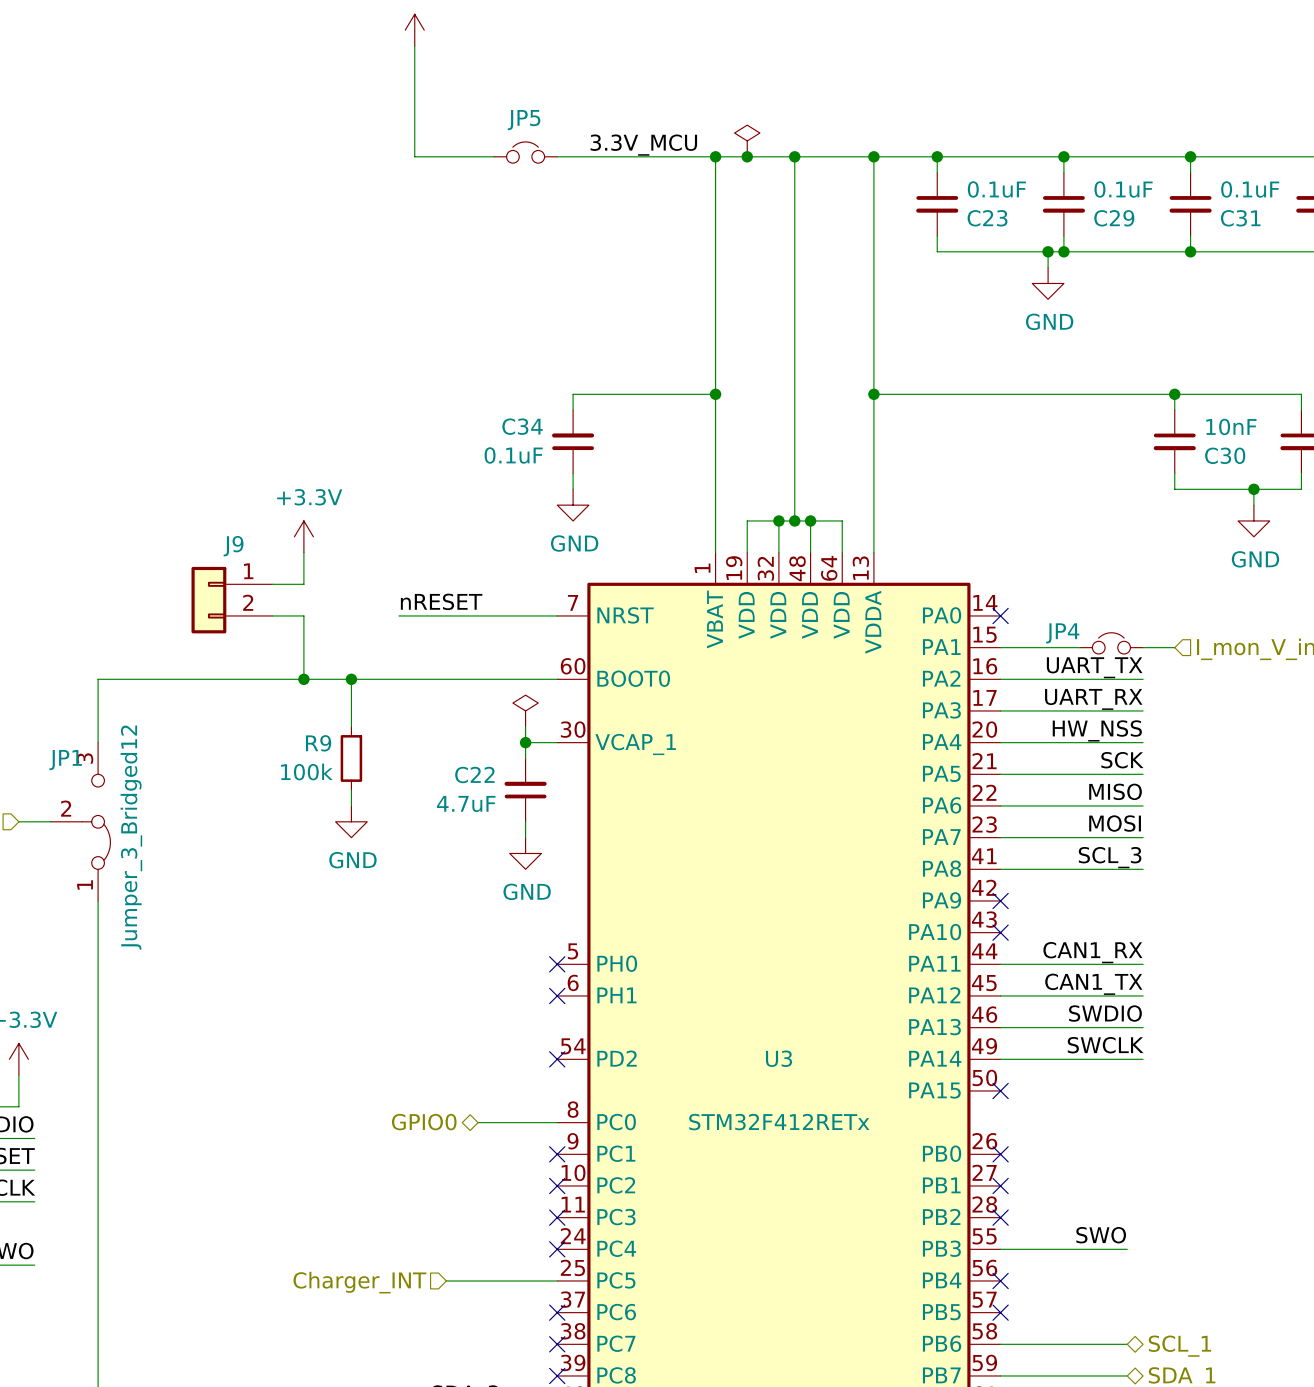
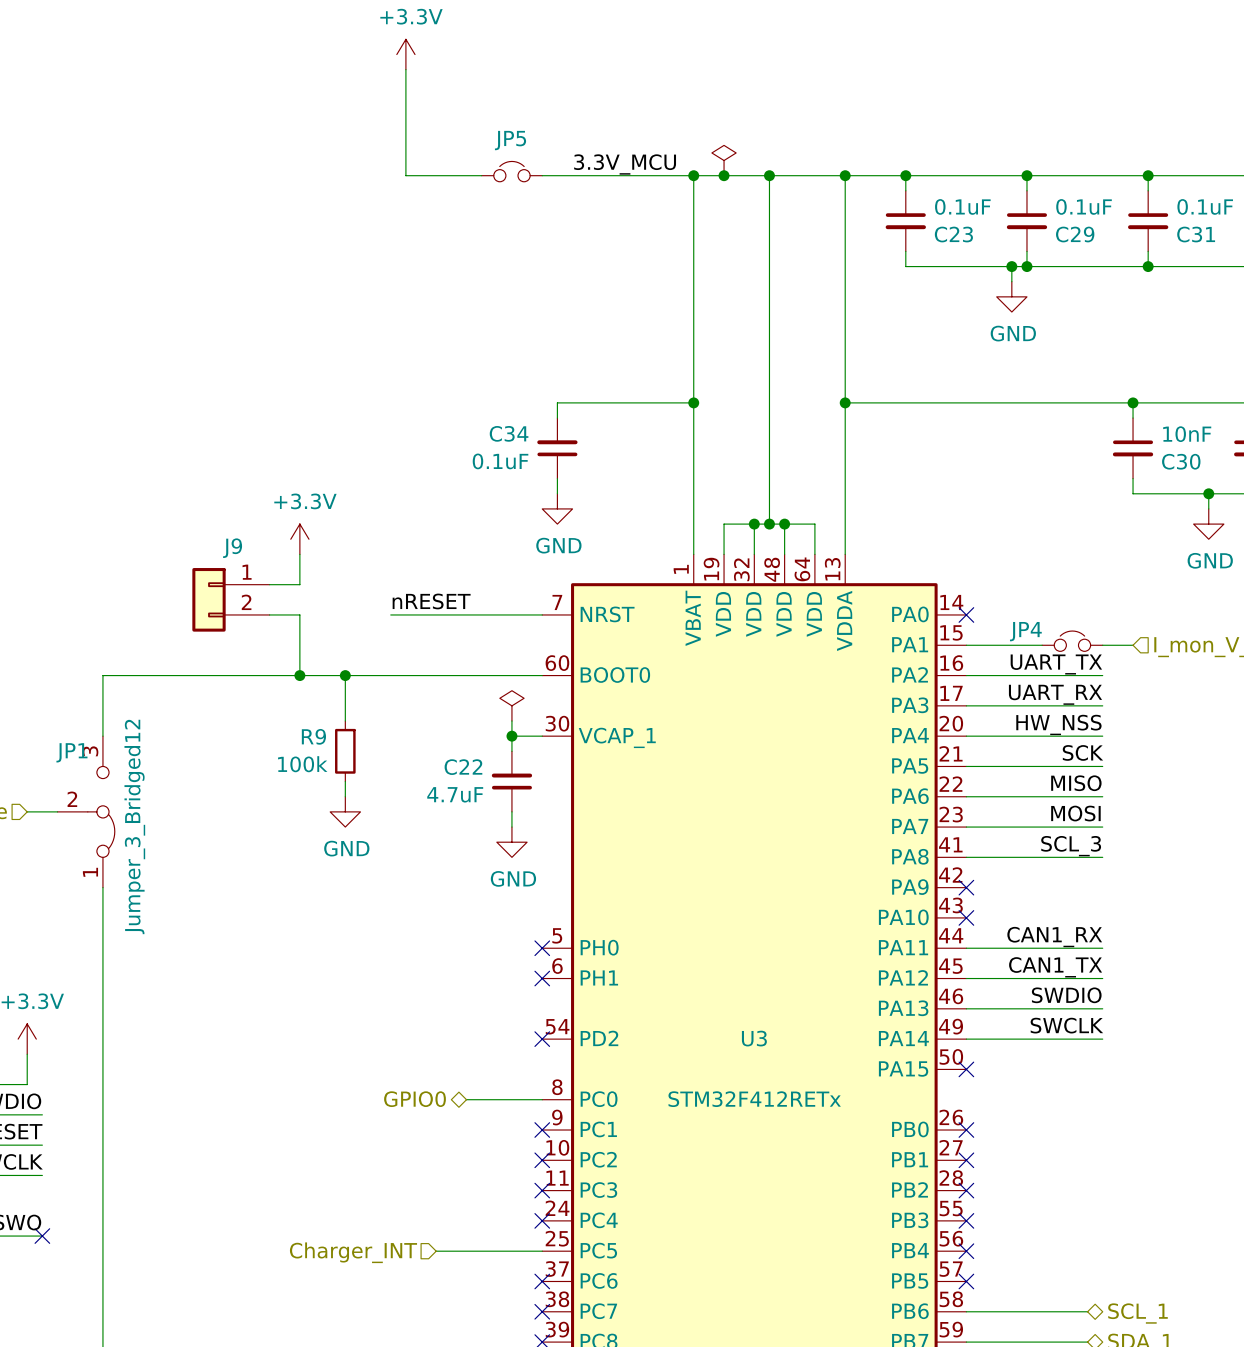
label: SWO (1101, 1235) -> none
wire: (1000, 1249) (1127, 1249) -> none
no-connect mark: none -> (966, 1220)
no-connect mark: none -> (42, 1236)

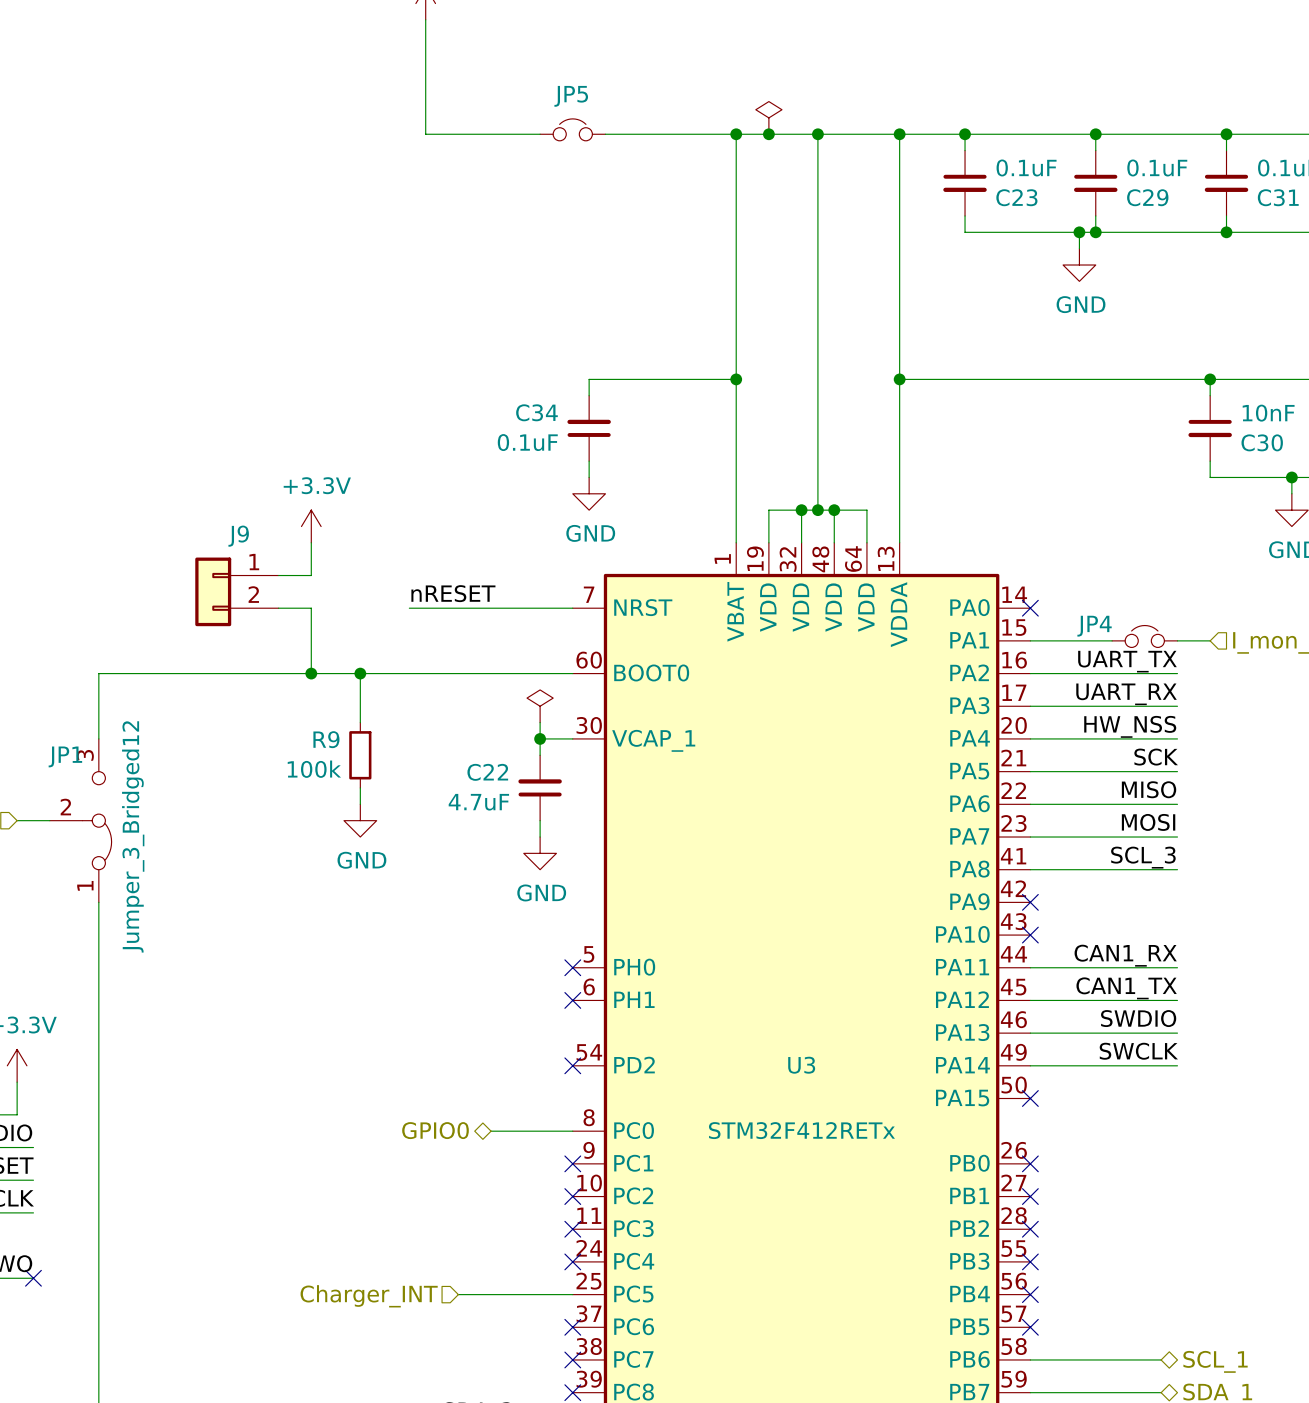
label: 3.3V_MCU (625, 164) -> none
JP5 position: (511, 171) -> (572, 129)
wire: (542, 175) (572, 175) -> (507, 134) (540, 134)

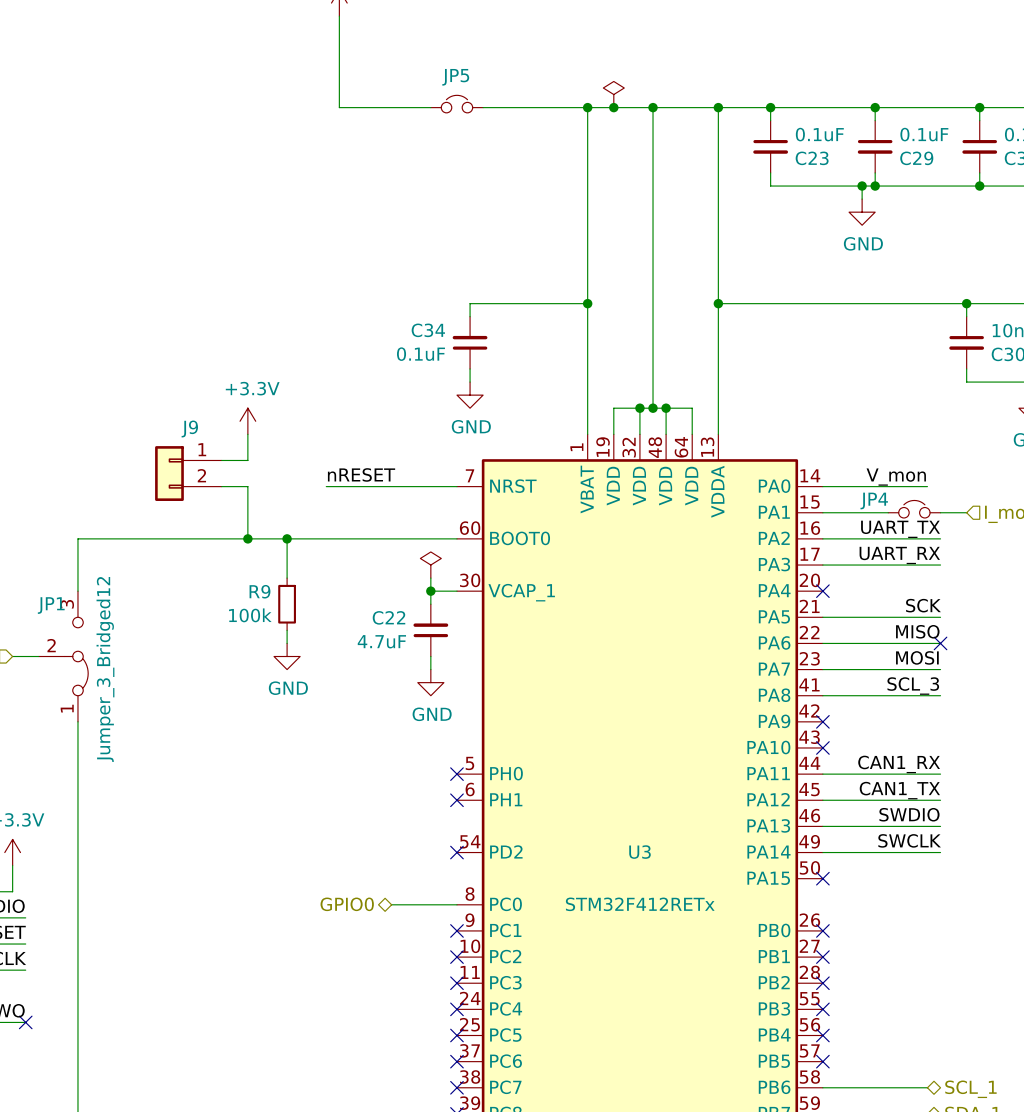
label: none -> V_mon (896, 477)
wire: none -> (822, 486) (927, 486)
no-connect mark: (1030, 608) -> none
label: HW_NSS (1130, 726) -> none
wire: (1030, 738) (1177, 738) -> none
no-connect mark: none -> (822, 591)
no-connect mark: none -> (940, 643)
wire: (458, 1294) (572, 1294) -> none
no-connect mark: none -> (456, 1035)
hierarchical label: Charger_INT (369, 1296) -> none

